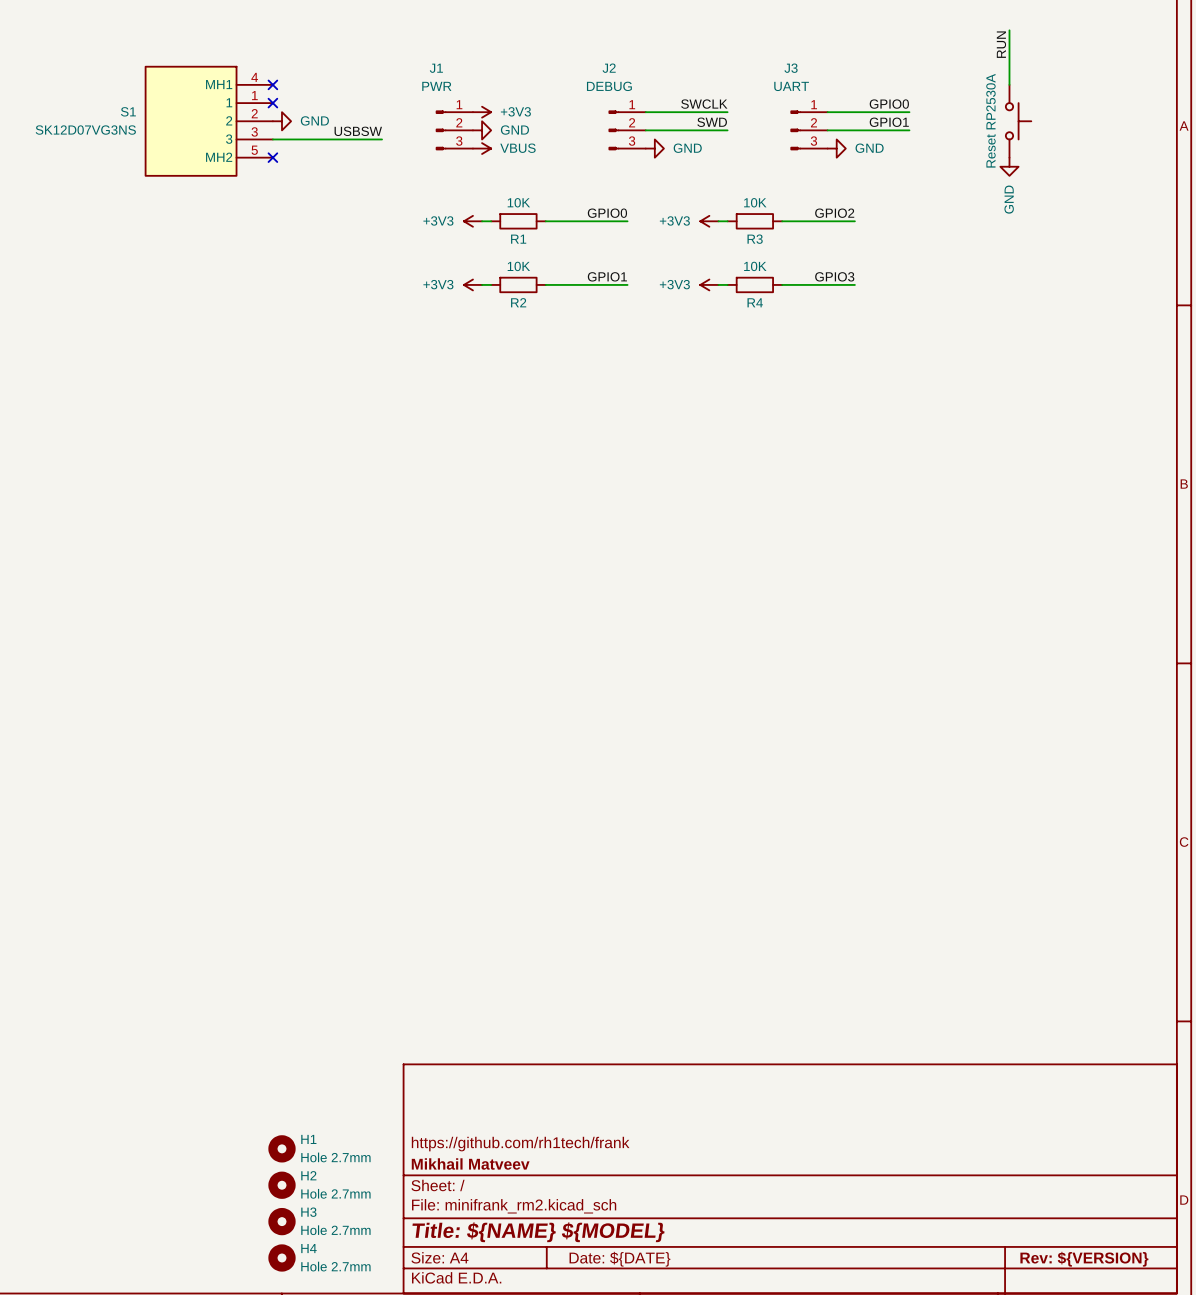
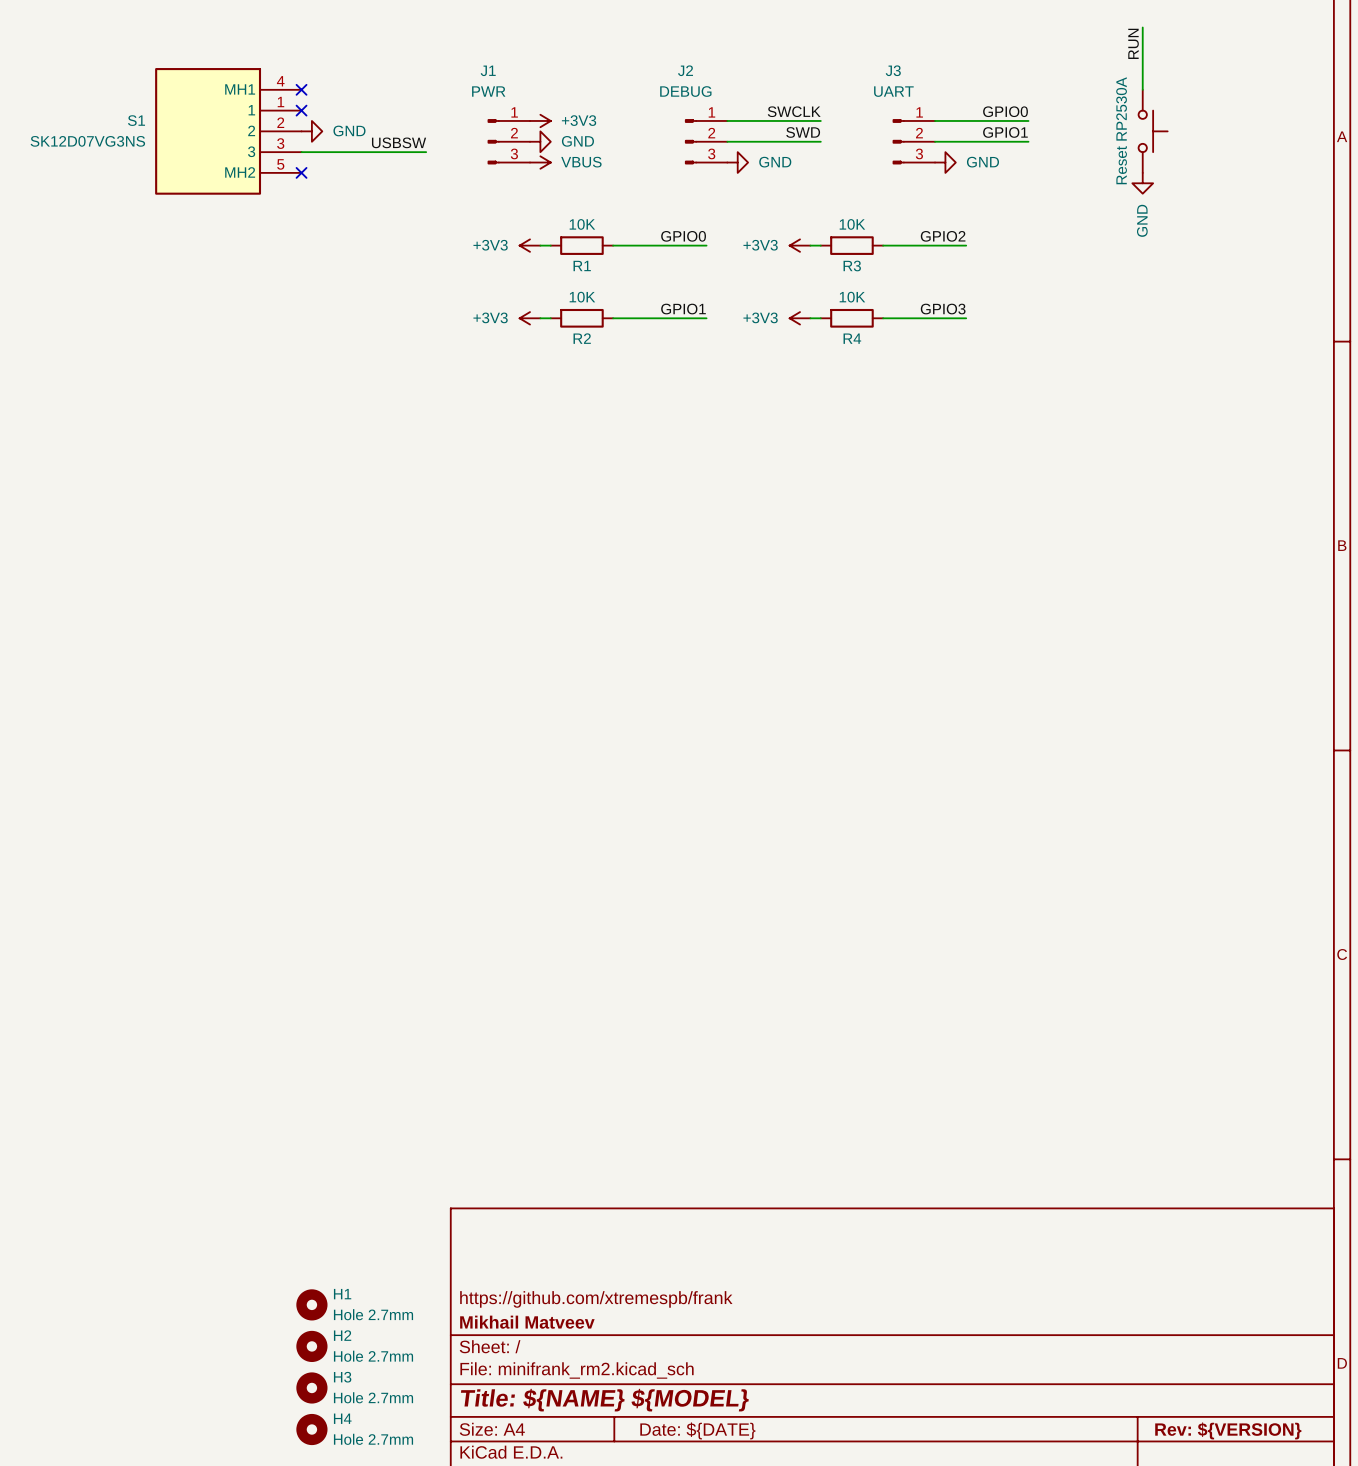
title block: https://github.com/rh1tech/frank (520, 1144) -> https://github.com/xtremespb/frank (596, 1299)

